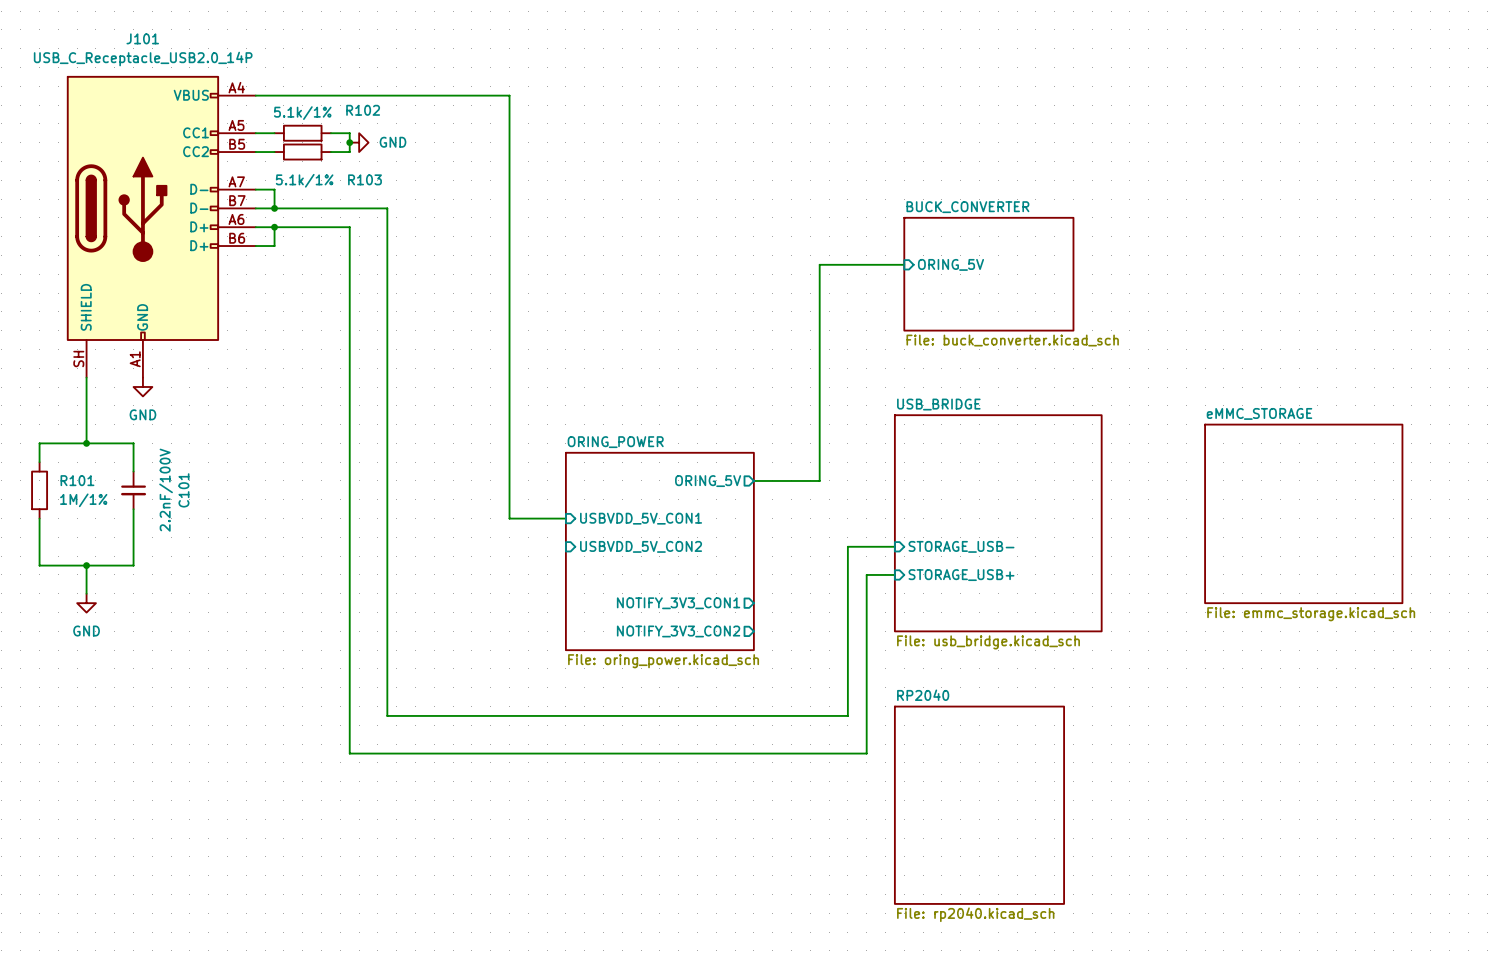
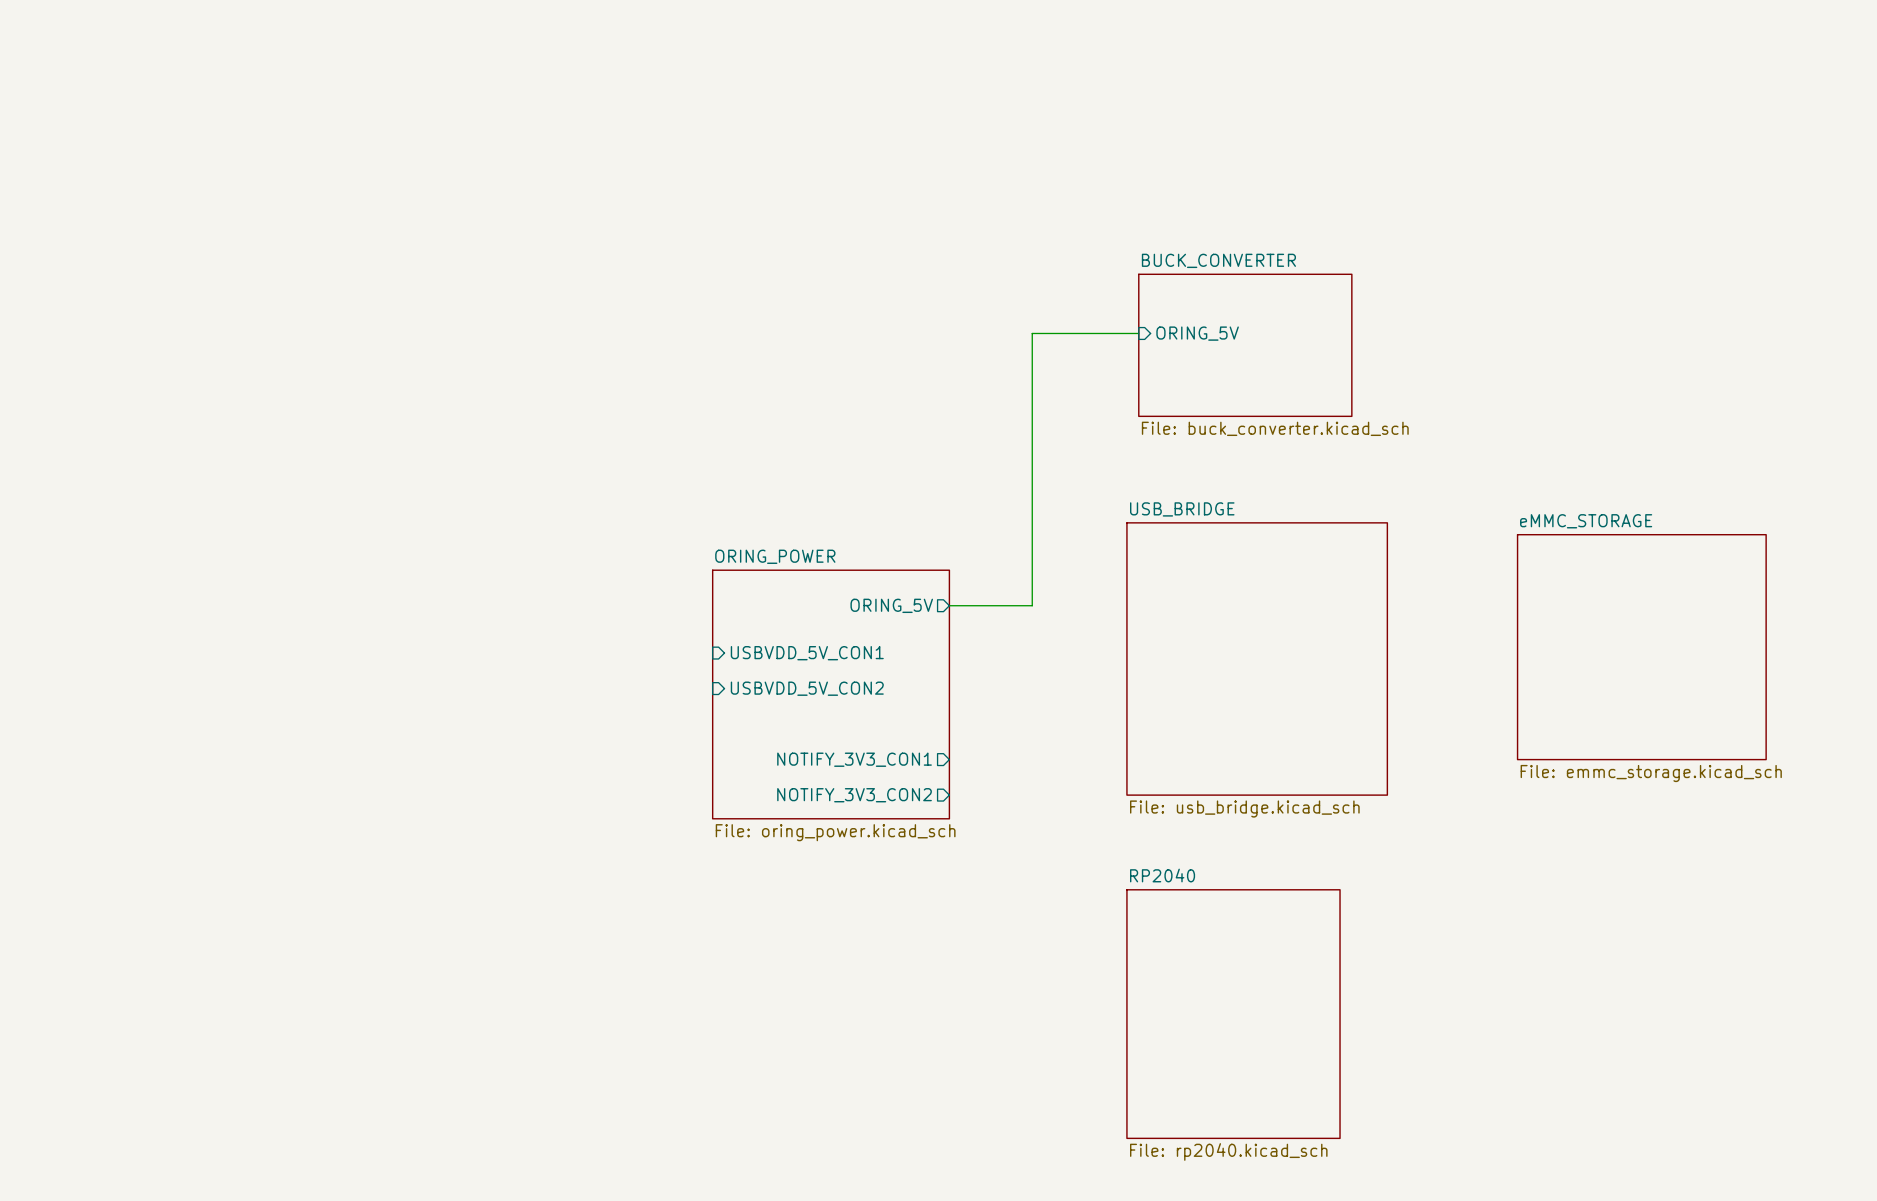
wire: (255, 95) (509, 95) (509, 518) (565, 518) -> none
wire: (255, 133) (274, 133) -> none
R102: 5.1k/1% (302, 133) -> none
wire: (330, 133) (349, 133) (349, 152) (330, 152) -> none
junction: (349, 142) -> none
power symbol: GND (359, 142) -> none
wire: (255, 152) (274, 152) -> none
R103: 5.1k/1% (302, 152) -> none
wire: (255, 189) (274, 189) (274, 208) -> none
wire: (255, 208) (387, 208) (387, 715) (847, 715) (847, 546) (894, 546) -> none
junction: (274, 208) -> none
J101: USB_C_Receptacle_USB2.0_14P (161, 226) -> none
wire: (255, 227) (349, 227) (349, 753) (866, 753) (866, 574) (894, 574) -> none
wire: (274, 227) (274, 246) (255, 246) -> none
junction: (274, 227) -> none
wire: (86, 377) (86, 443) -> none
power symbol: GND (142, 387) -> none
junction: (86, 443) -> none
wire: (39, 462) (39, 443) (133, 443) (133, 471) -> none
R101: 1M/1% (39, 490) -> none
C101: 2.2nF/100V (133, 490) -> none
wire: (133, 509) (133, 565) (39, 565) (39, 518) -> none
sheet pin: STORAGE_USB- (961, 546) -> none
wire: (86, 565) (86, 593) -> none
junction: (86, 565) -> none
sheet pin: STORAGE_USB+ (961, 575) -> none
power symbol: GND (86, 603) -> none

